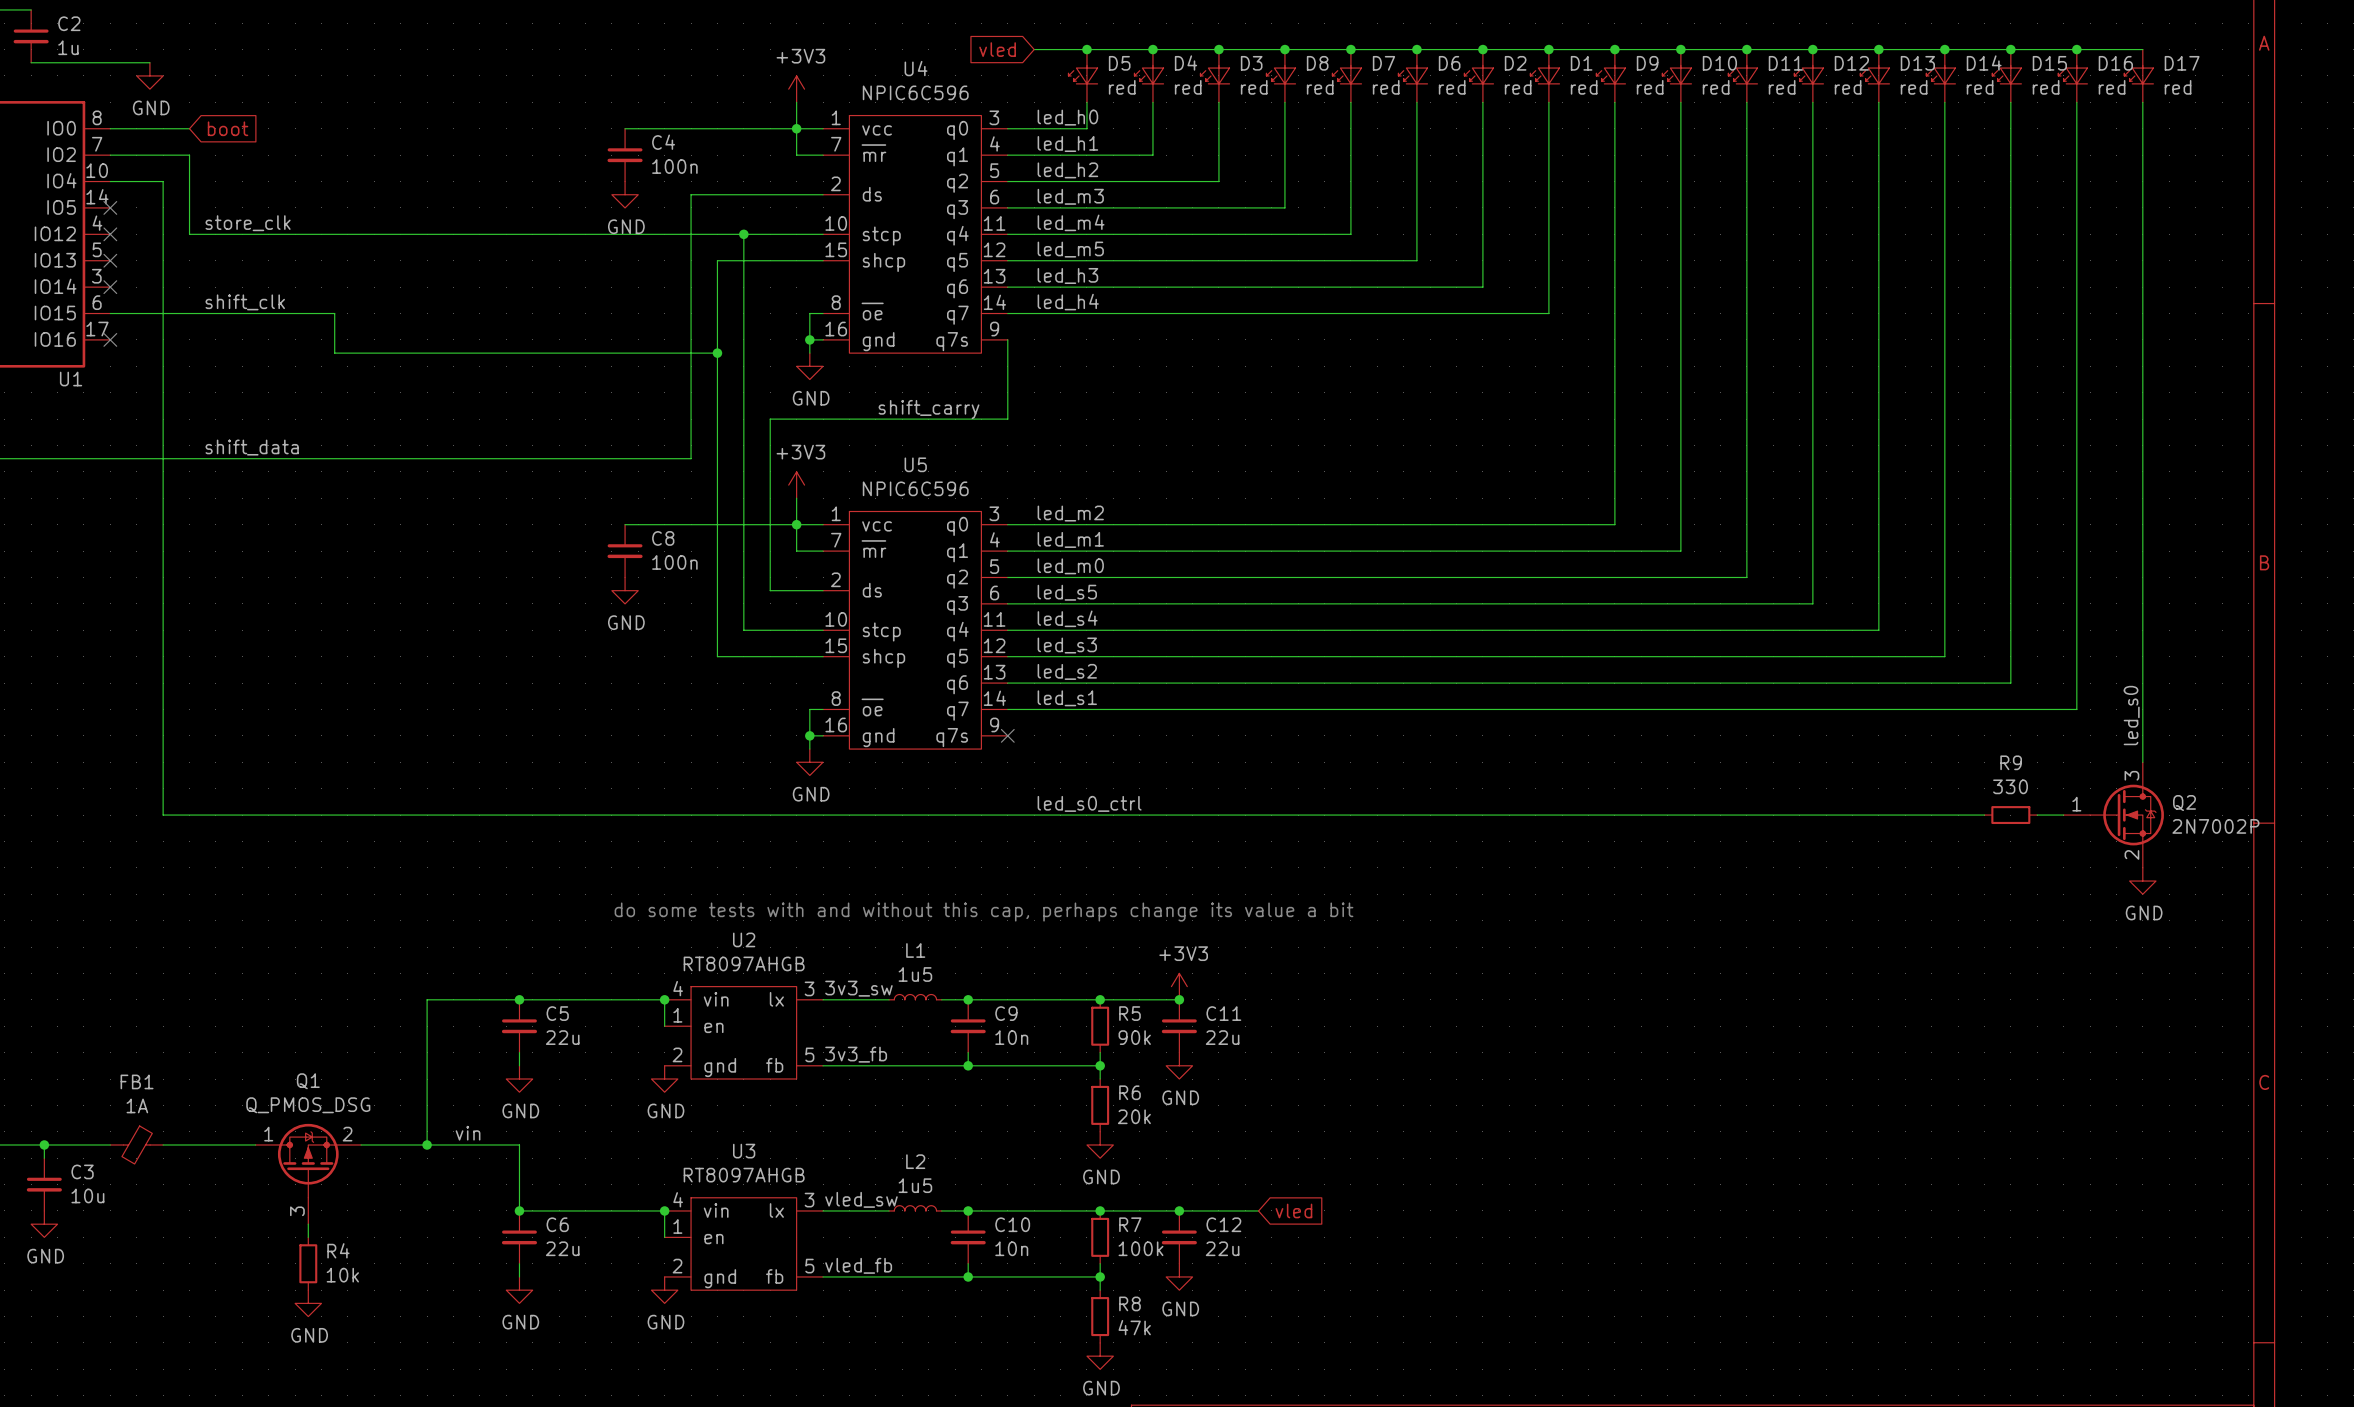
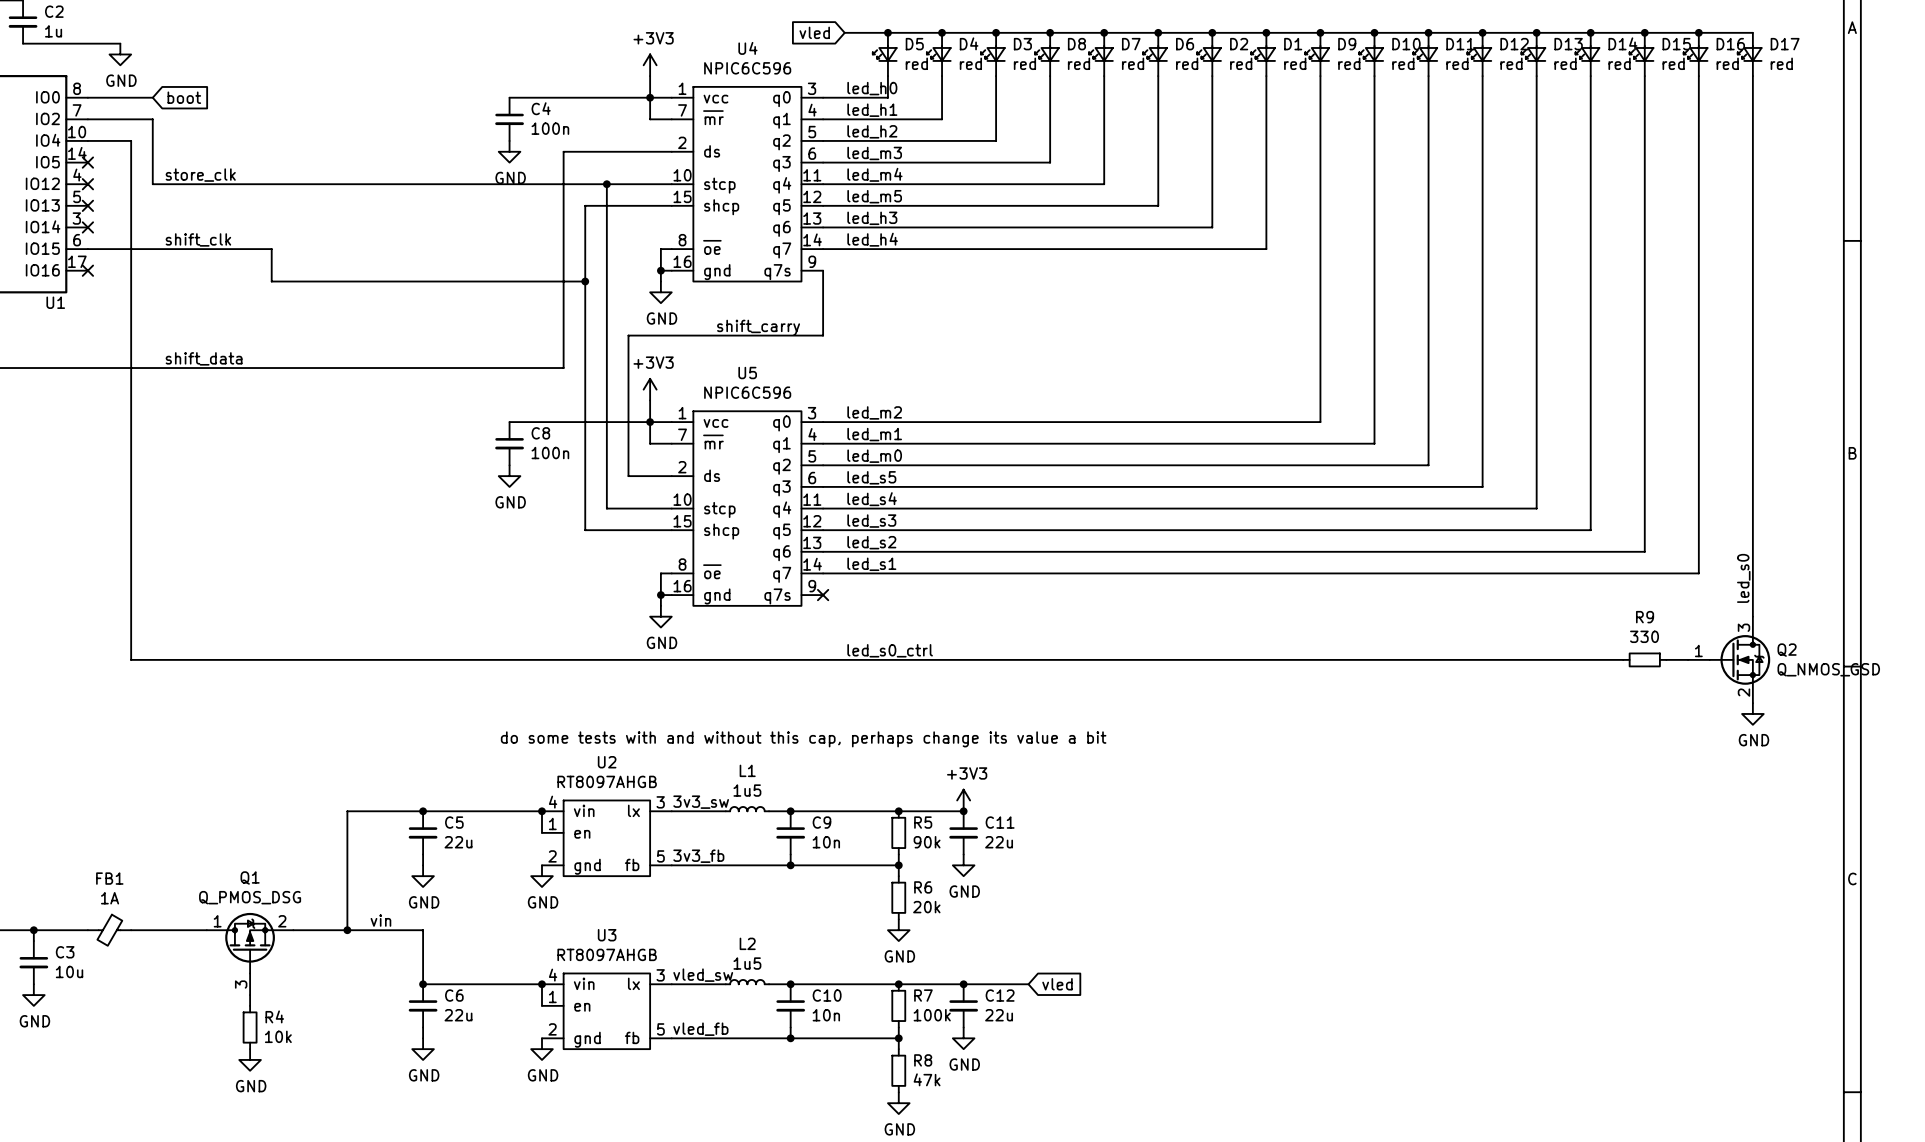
Q2 value: 2N7002P (2215, 826) -> Q_NMOS_GSD (1828, 669)

